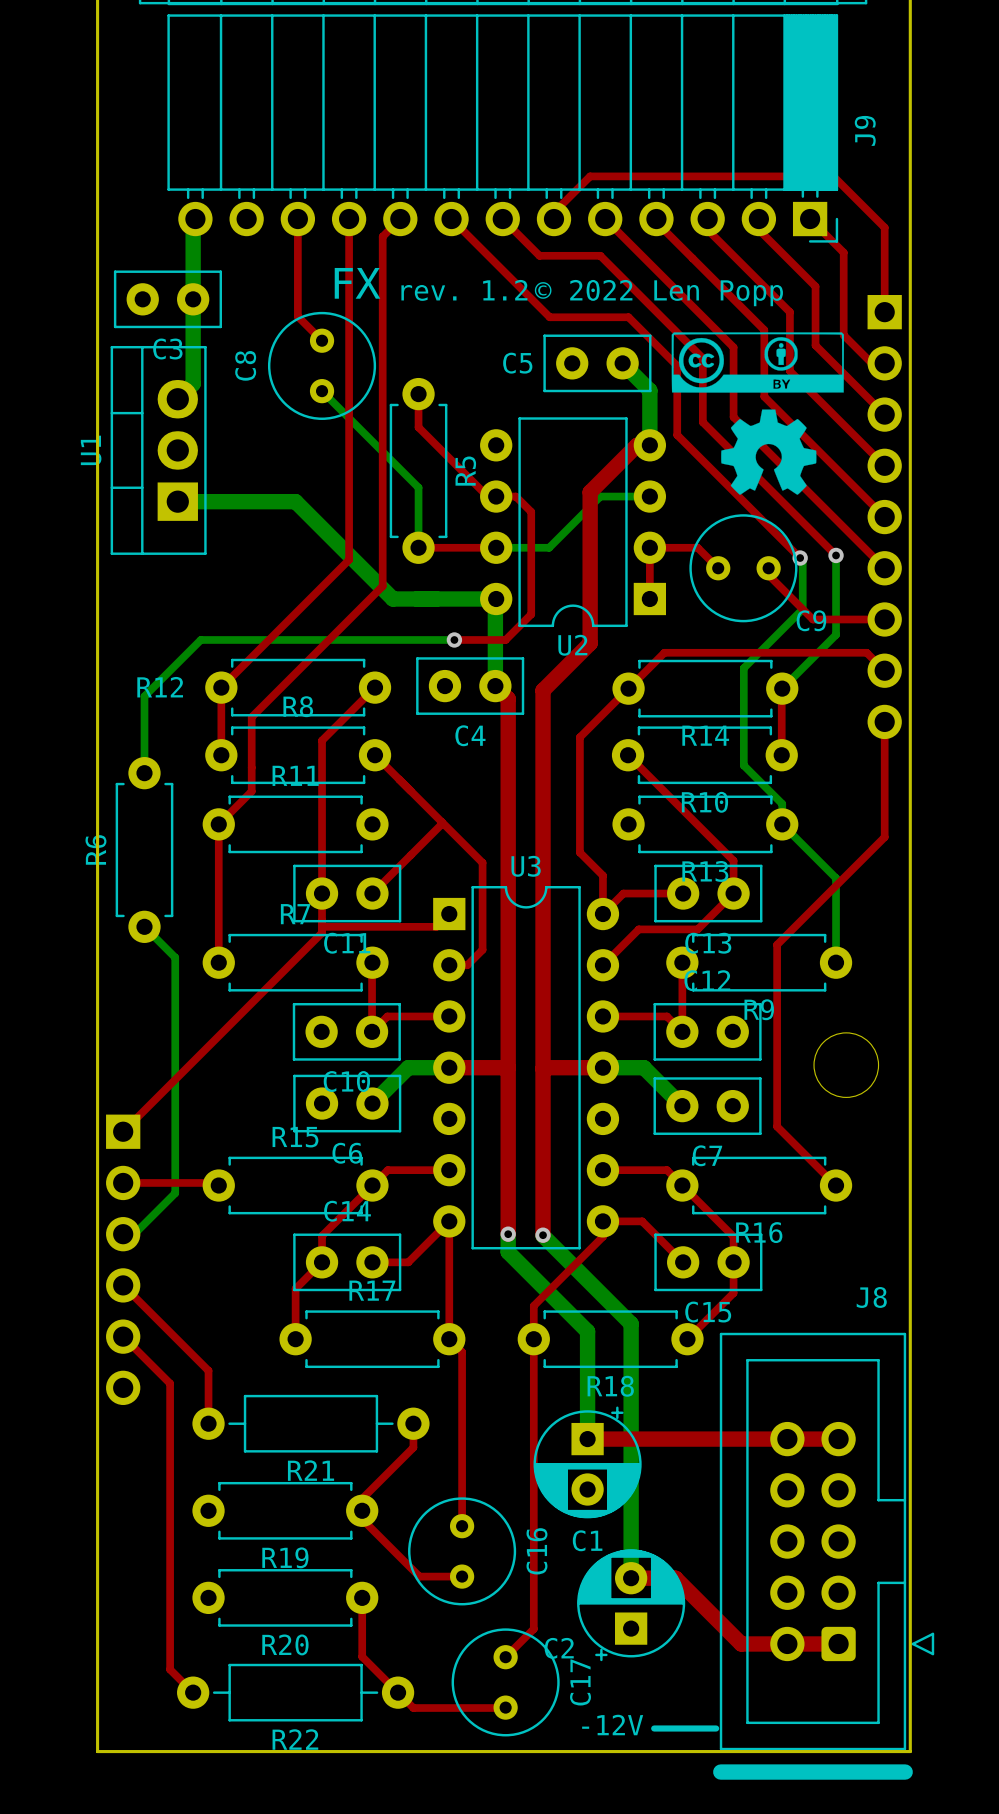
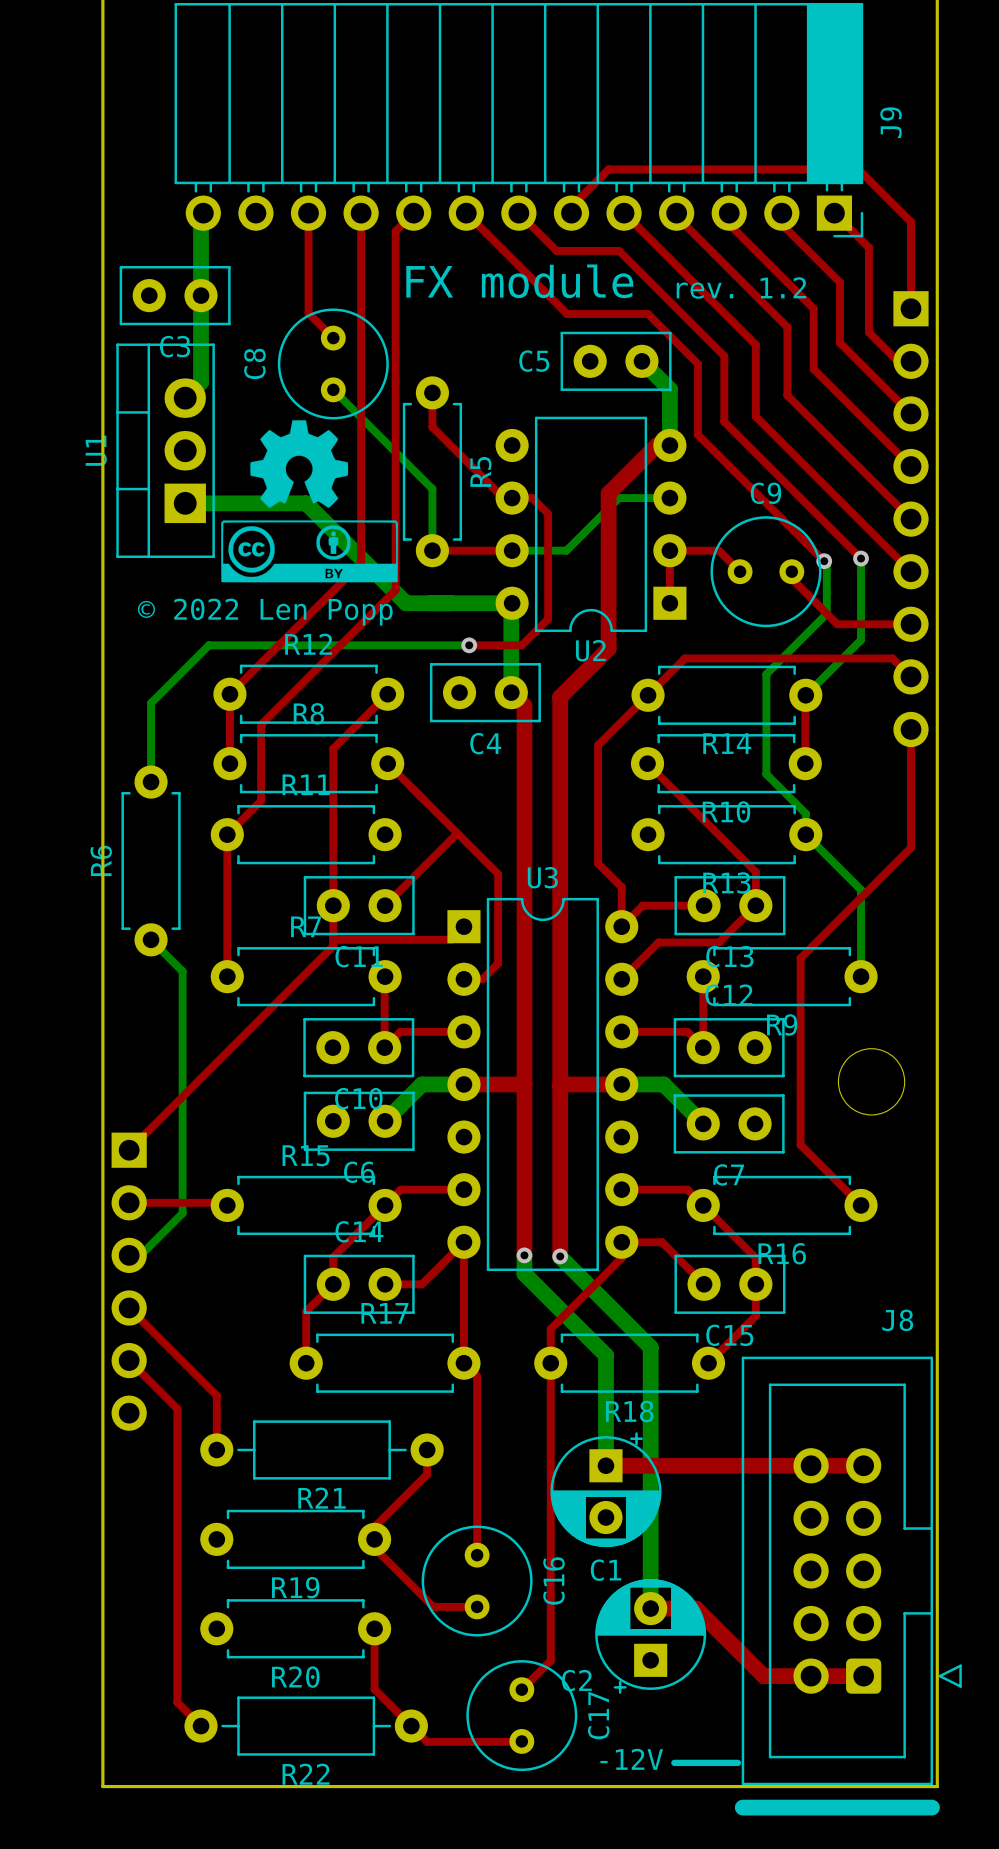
text: FX (357, 283) -> none
text: rev. 1.2 (464, 290) -> FX module (519, 281)
text: none -> rev. 1.2 (741, 288)
text: © 2022 Len Popp (658, 293) -> none
drawing position: (757, 362) -> (309, 551)
drawing position: (768, 452) -> (299, 464)
text: none -> © 2022 Len Popp (265, 612)
C9 name position: C9 (811, 620) -> C9 (765, 493)
R12 name position: R12 (160, 687) -> R12 (308, 644)

